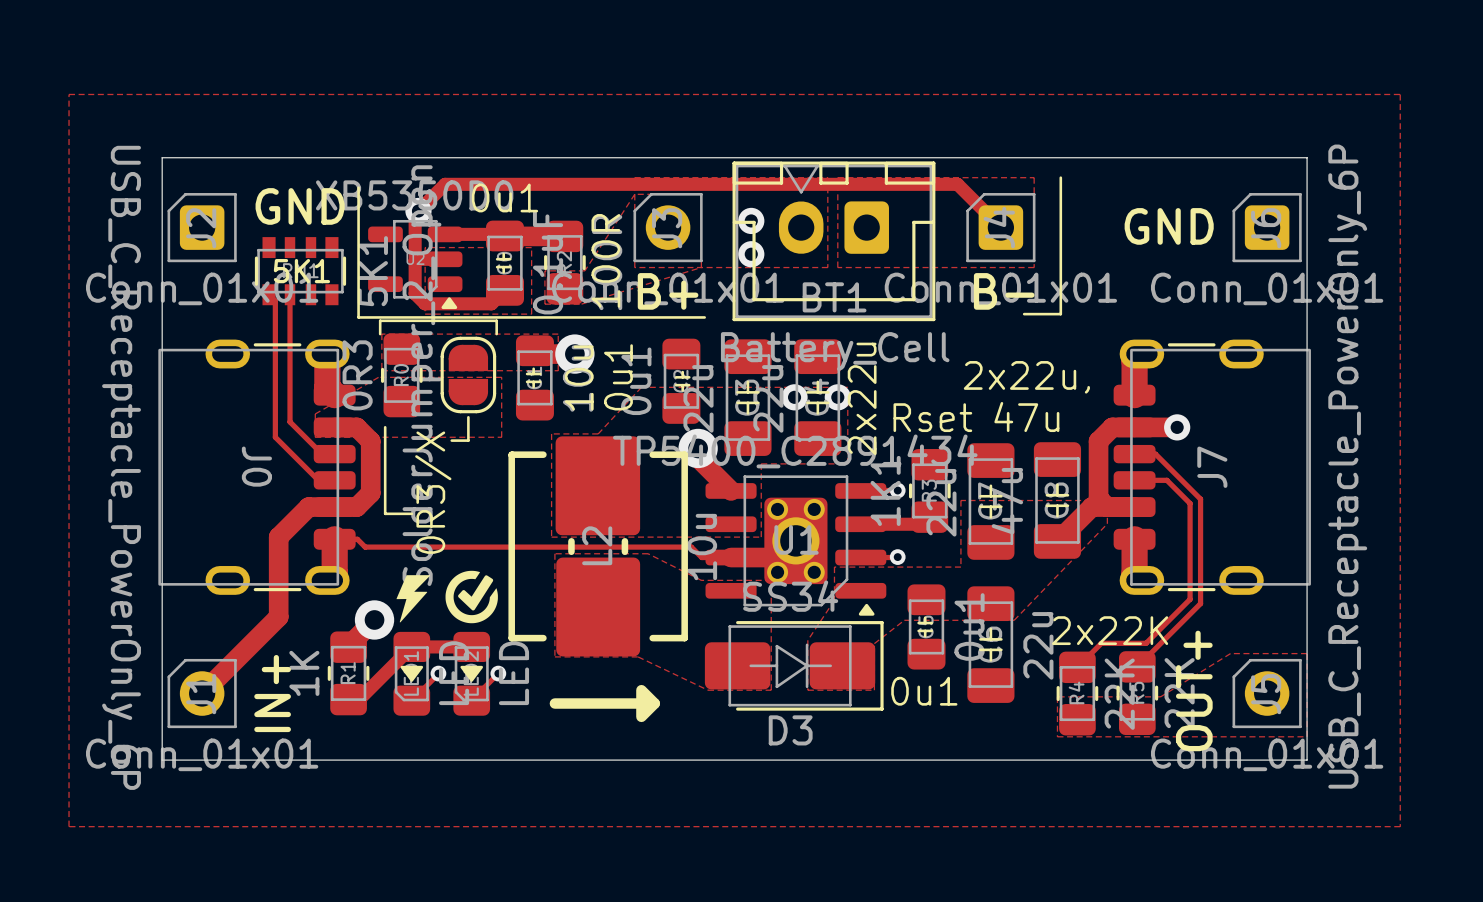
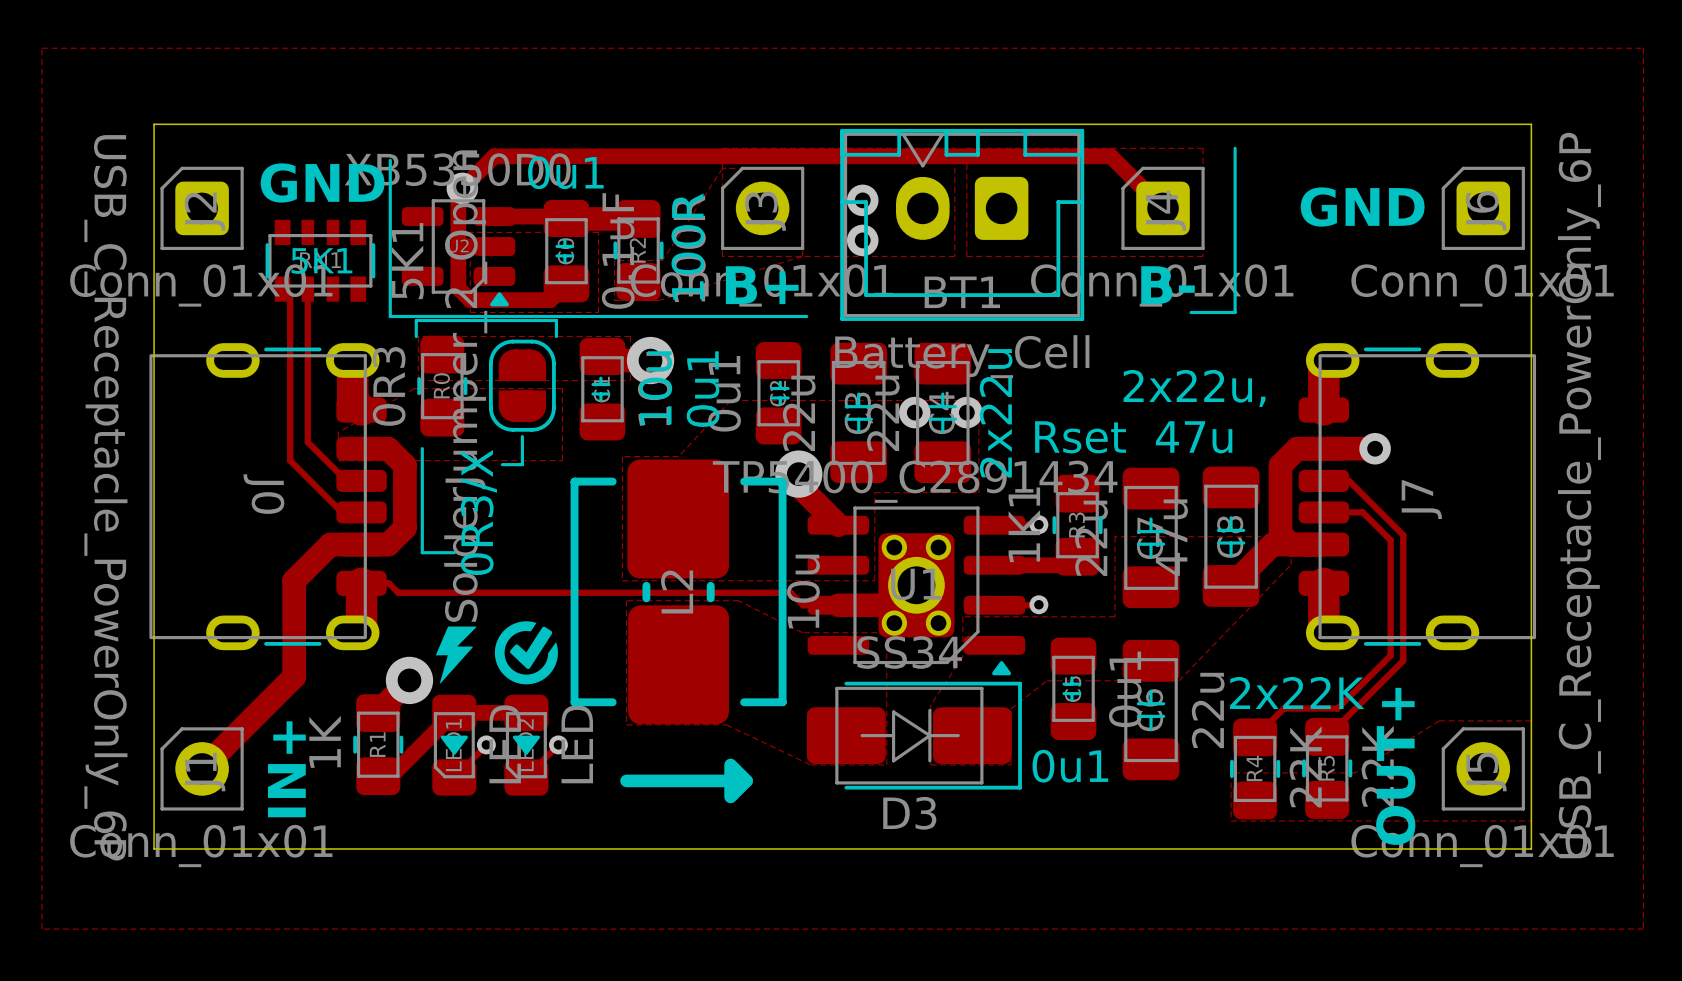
L2 footprint: [508, 436, 688, 657] -> [570, 459, 787, 725]

